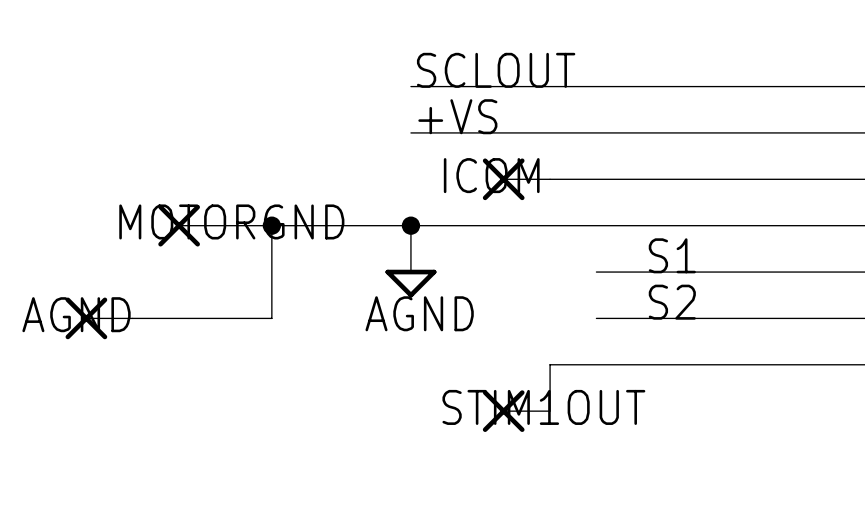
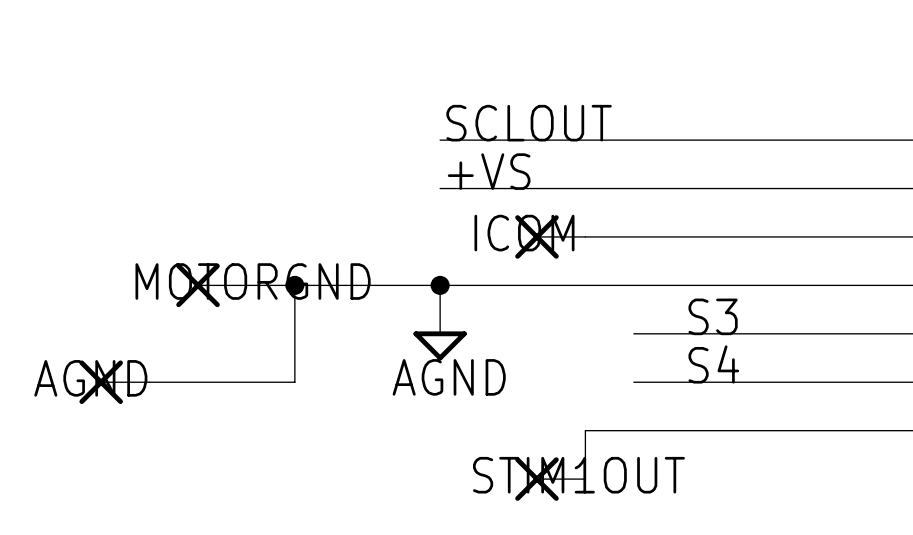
label: S1 (672, 255) -> S3 (713, 316)
label: S2 (672, 302) -> S4 (713, 364)

